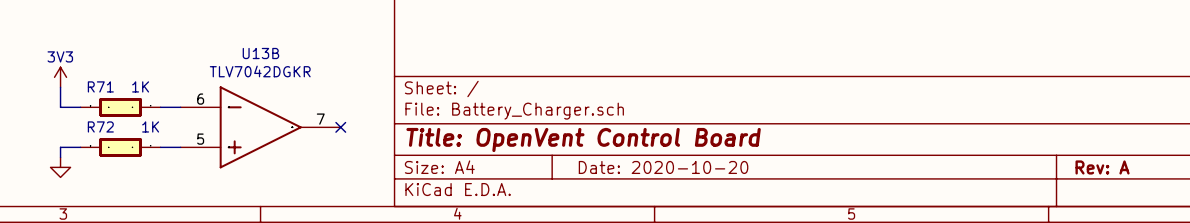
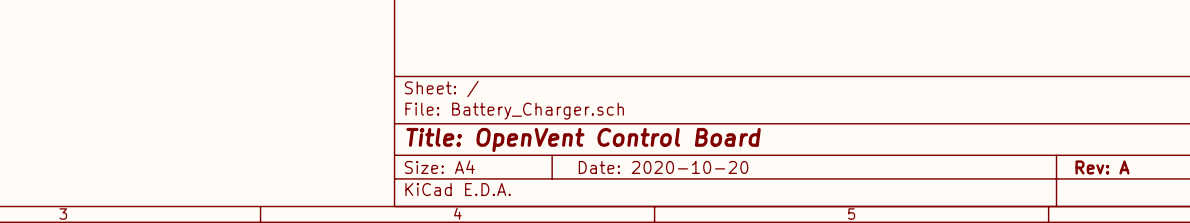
power symbol: 3V3 (60, 77) -> none
wire: (60, 87) (60, 107) (80, 107) -> none
R71: (120, 107) -> none
wire: (160, 107) (180, 107) -> none
U13B: TLV7042DGKR (260, 127) -> none
no-connect mark: (340, 127) -> none
wire: (80, 147) (60, 147) (60, 157) -> none
R72: (120, 147) -> none
wire: (160, 147) (180, 147) -> none
power symbol: (60, 167) -> none

